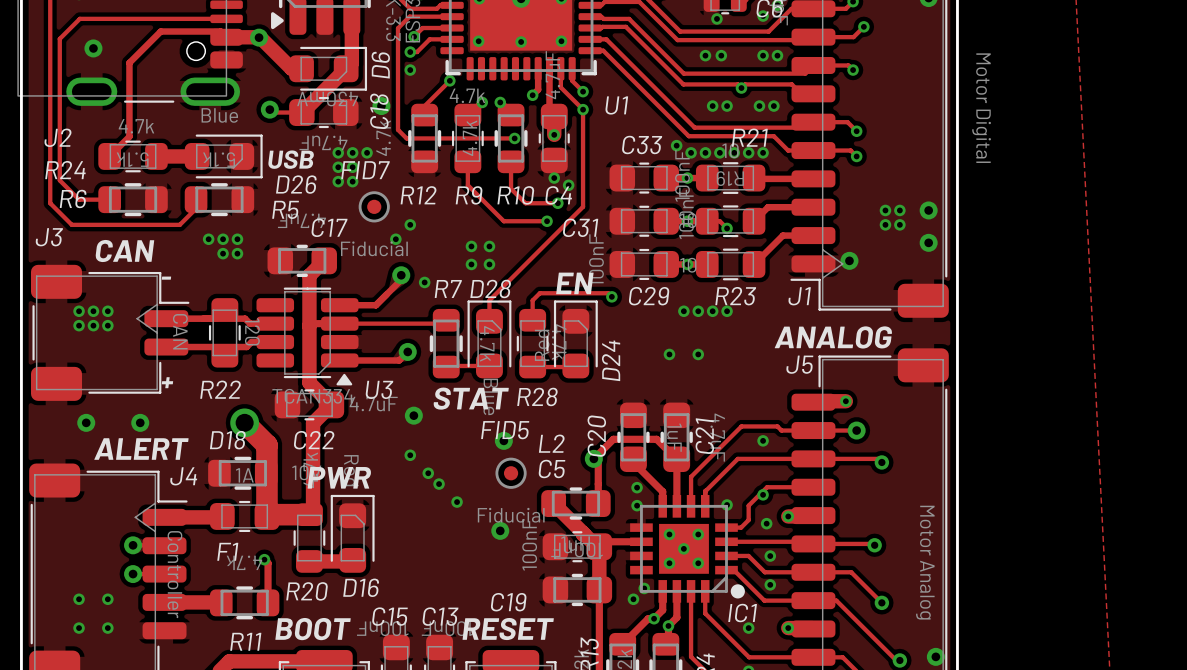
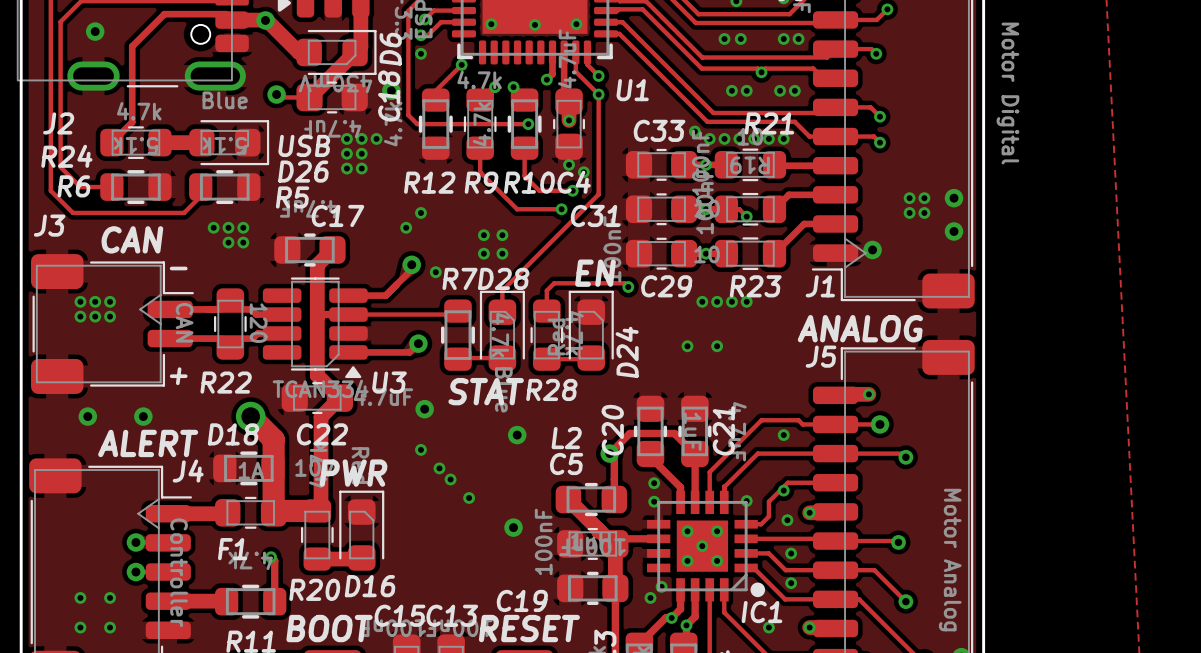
FID7: Fiducial (374, 206) -> none
FID5: Fiducial (511, 473) -> none

